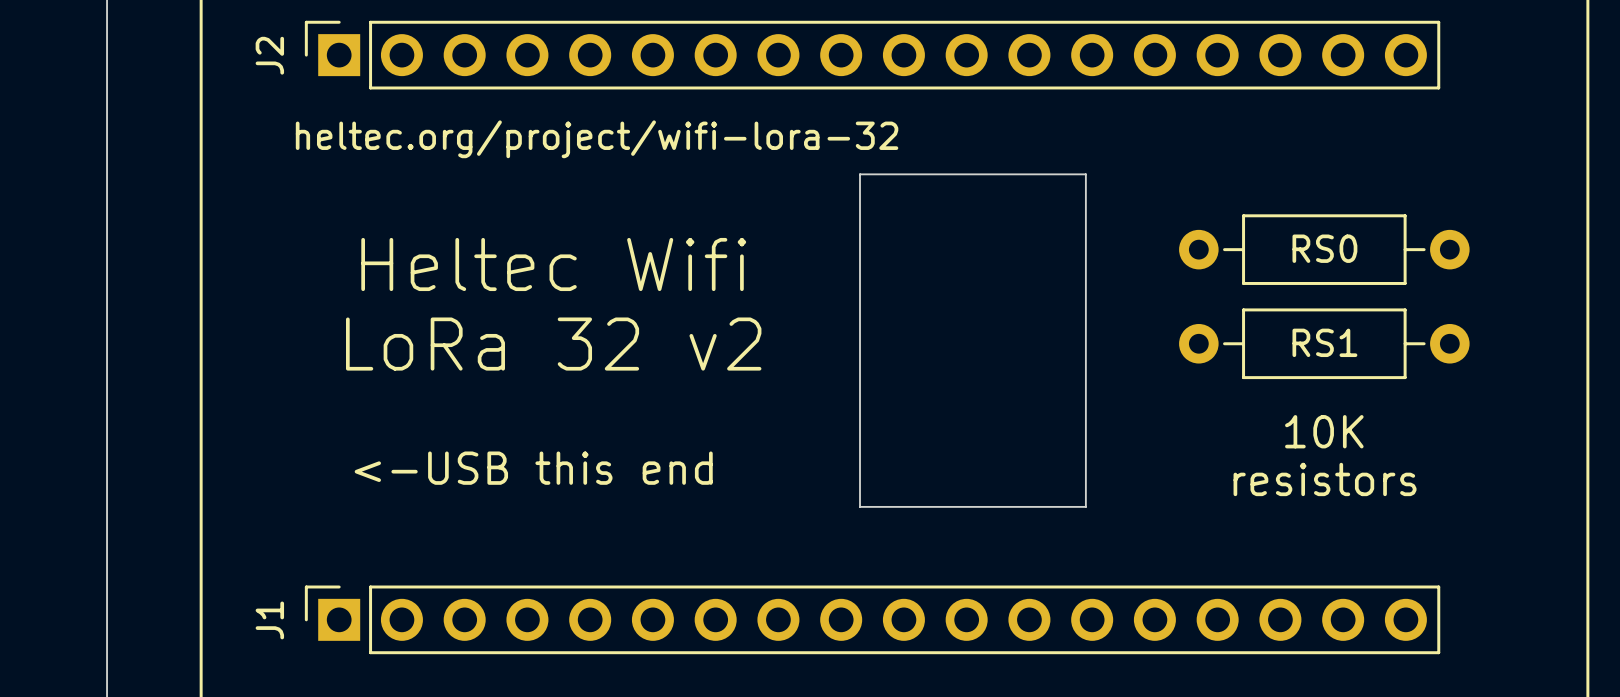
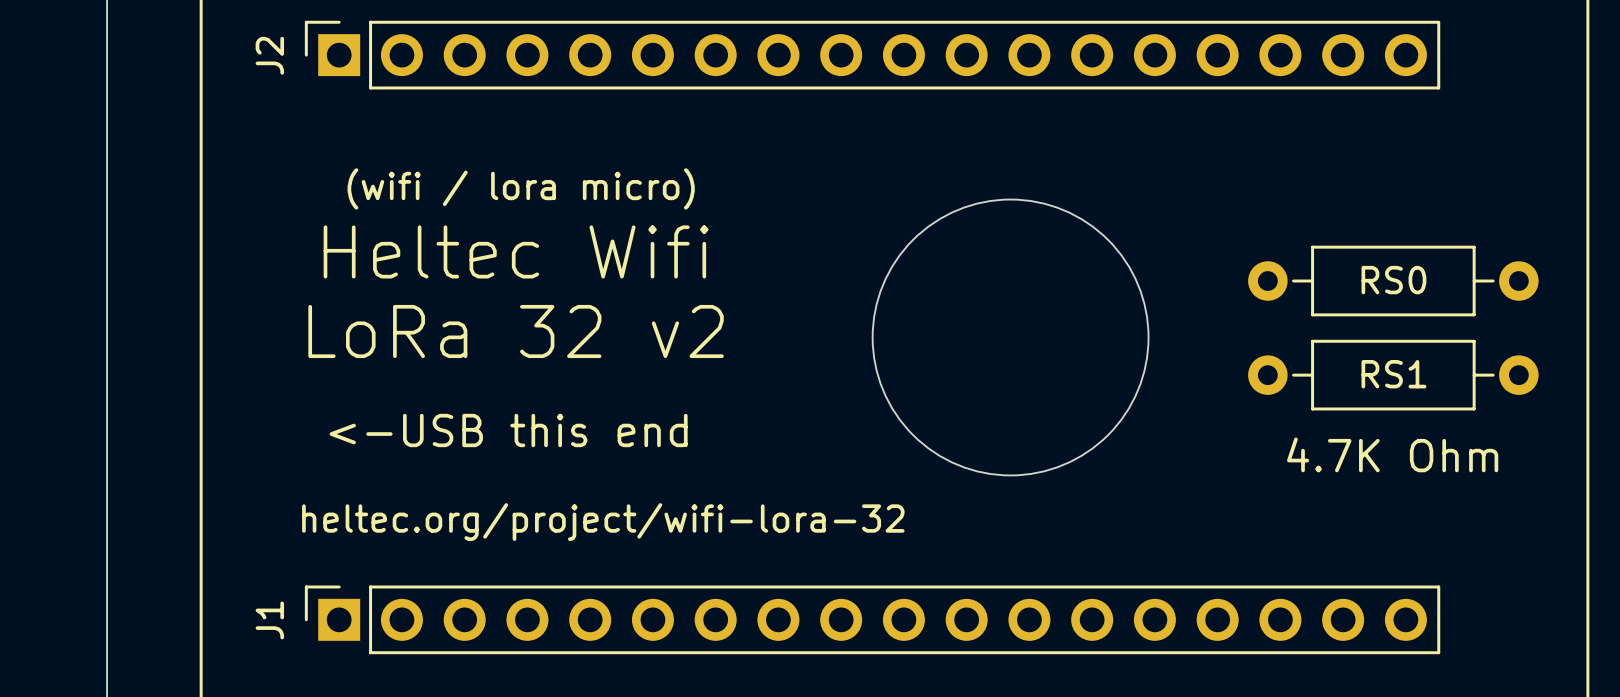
text position: heltec.org/project/wifi-lora-32 (597, 139) -> heltec.org/project/wifi-lora-32 (603, 522)
board edge: (860, 174) (860, 506) (1085, 506) (1085, 174) (860, 174) -> none
text: none -> (wifi / lora micro) (521, 188)
round board edge: none -> [872, 198, 1150, 477]
RS0 position: (1324, 249) -> (1393, 281)
text position: Heltec Wifi (553, 264) -> Heltec Wifi (516, 251)
RS1 position: (1324, 343) -> (1393, 375)
text position: LoRa 32 v2 (553, 344) -> LoRa 32 v2 (516, 331)
text: 10K (1324, 431) -> none
text: none -> 4.7K Ohm (1392, 454)
text position: <-USB this end (533, 468) -> <-USB this end (508, 430)
text: resistors (1325, 479) -> none

